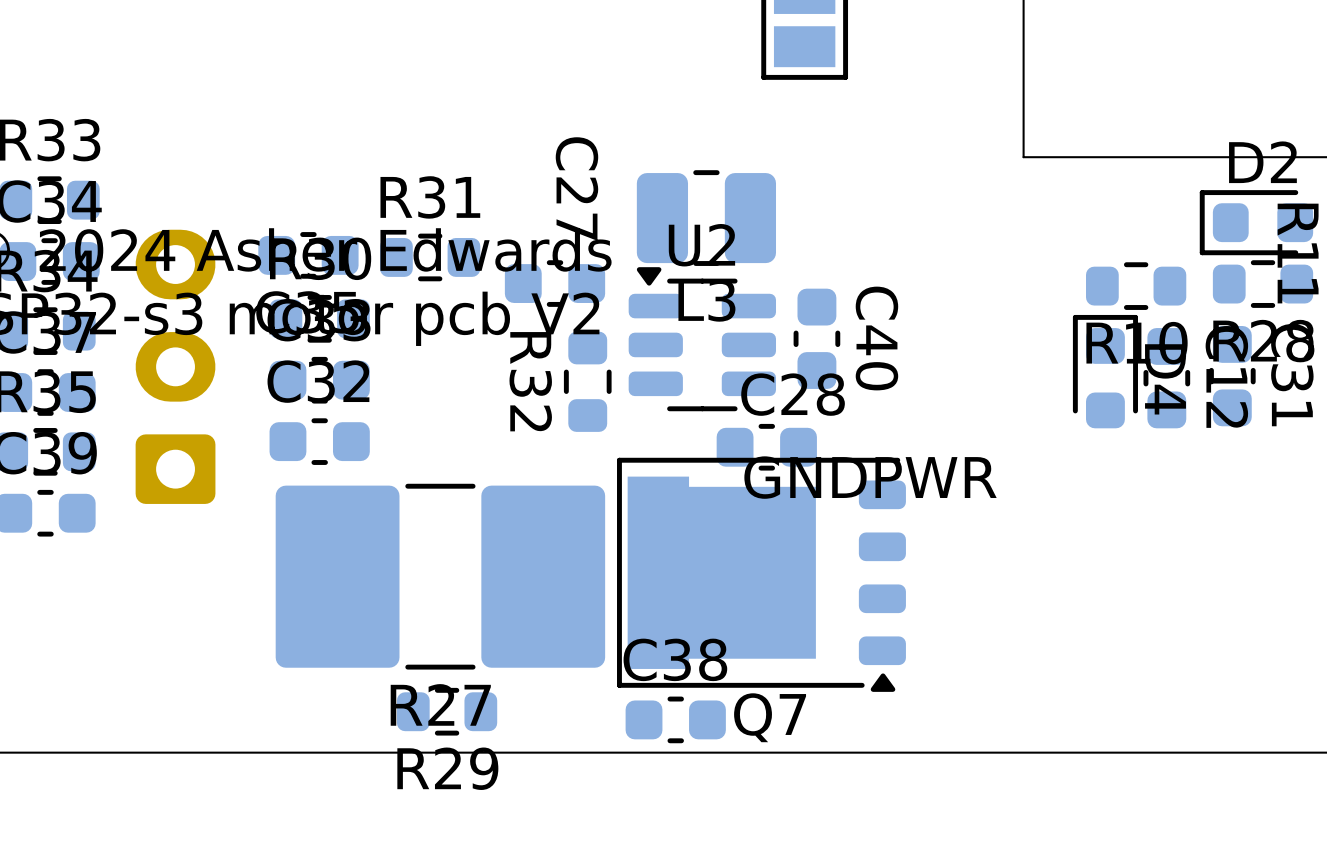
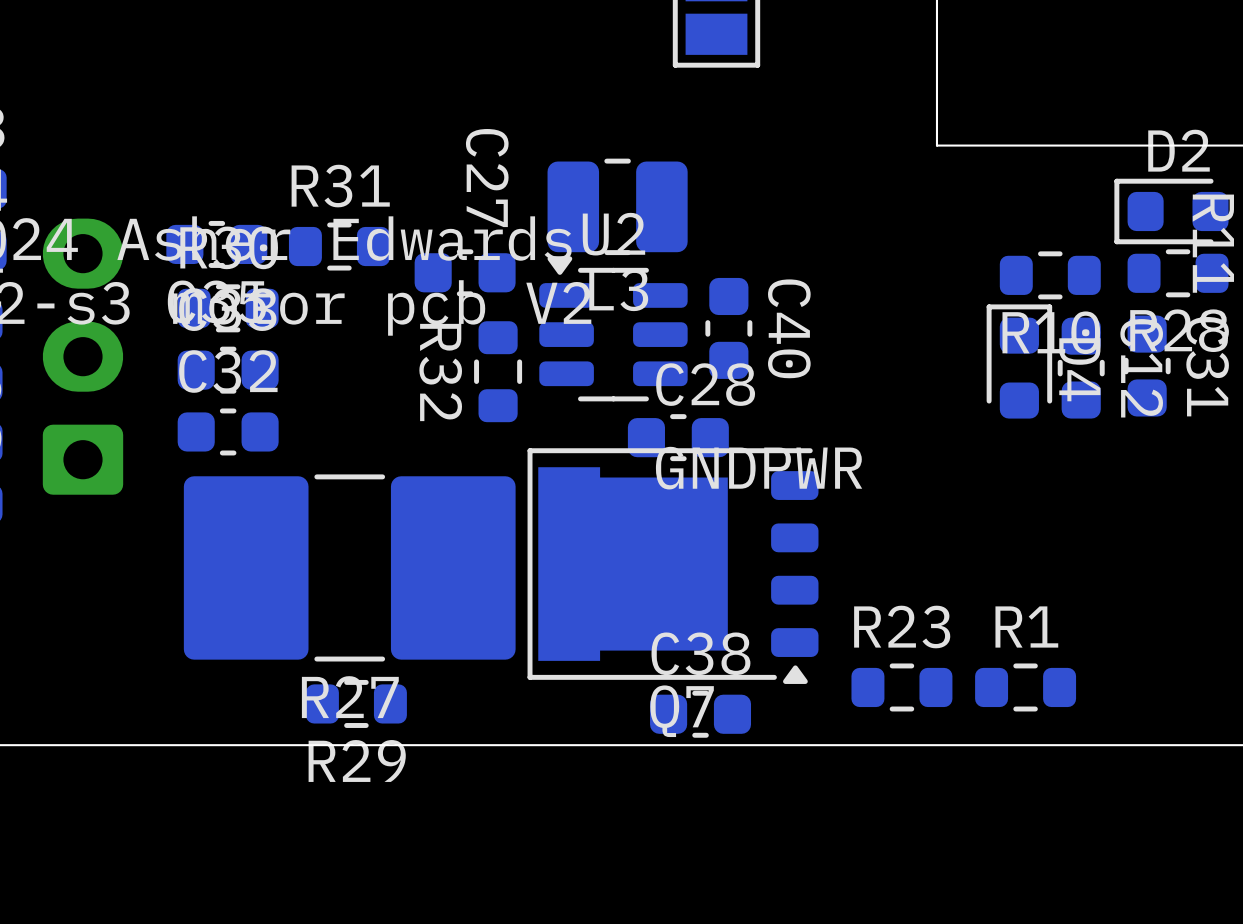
R23: none -> (901, 687)
R1: none -> (1025, 687)
C38 position: (675, 719) -> (700, 714)

